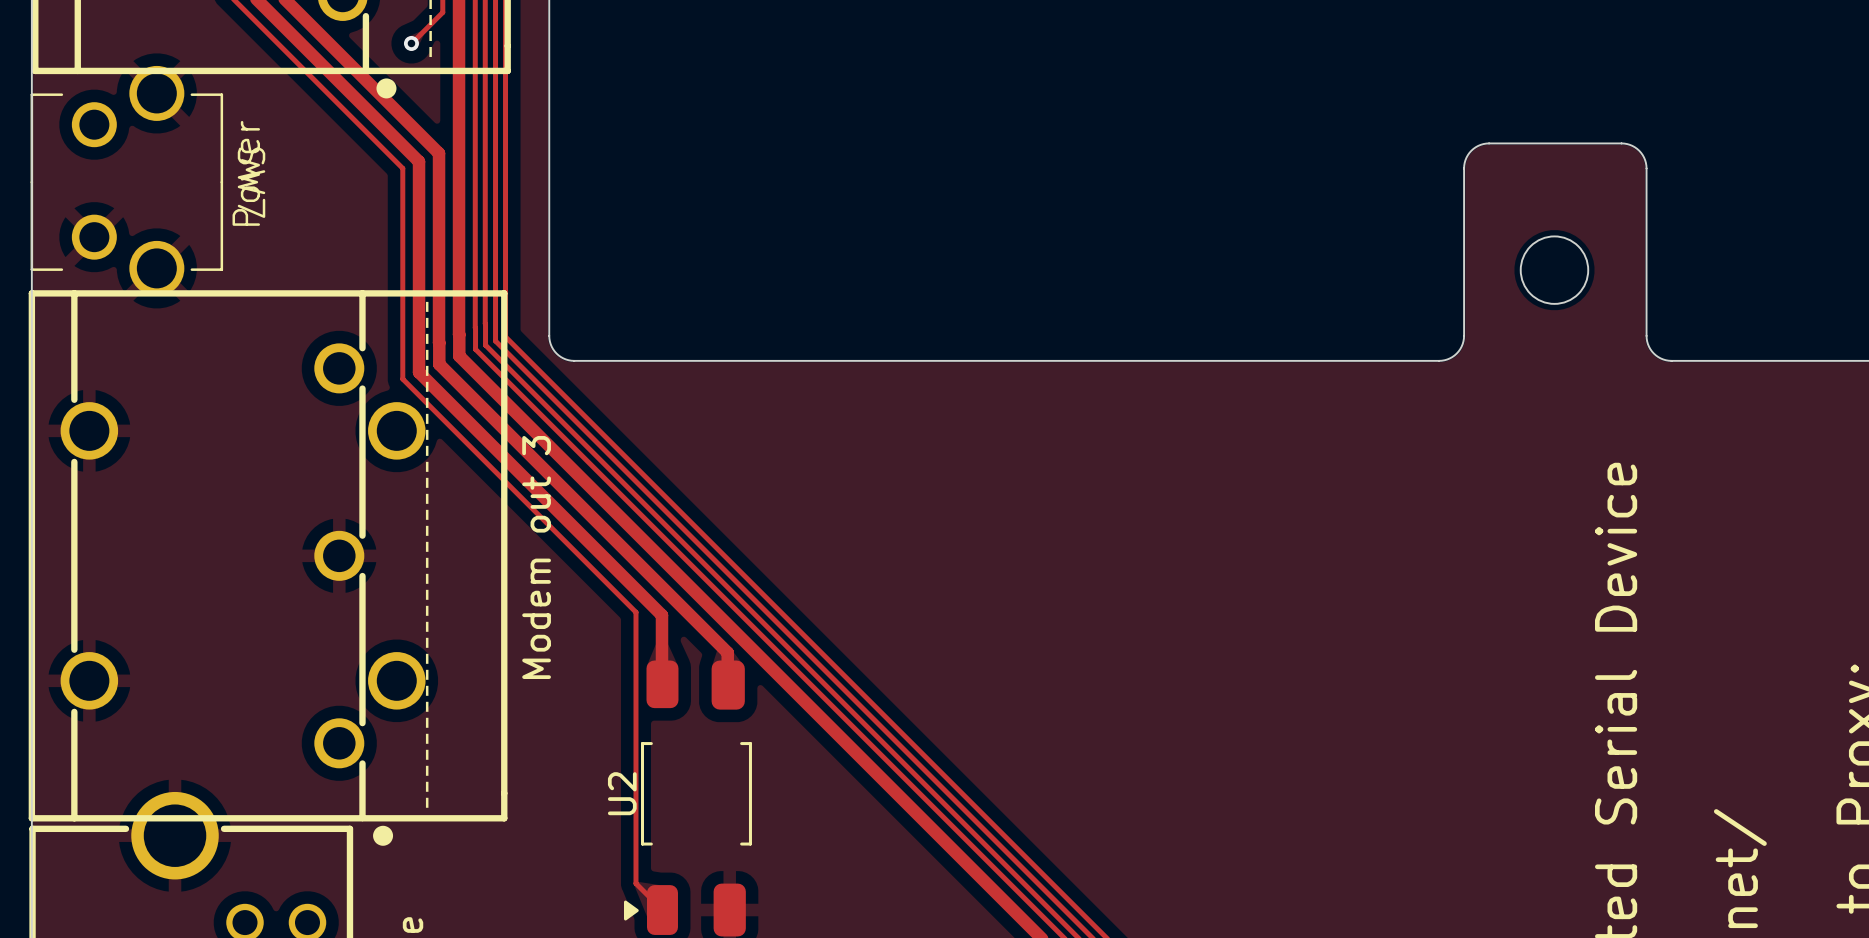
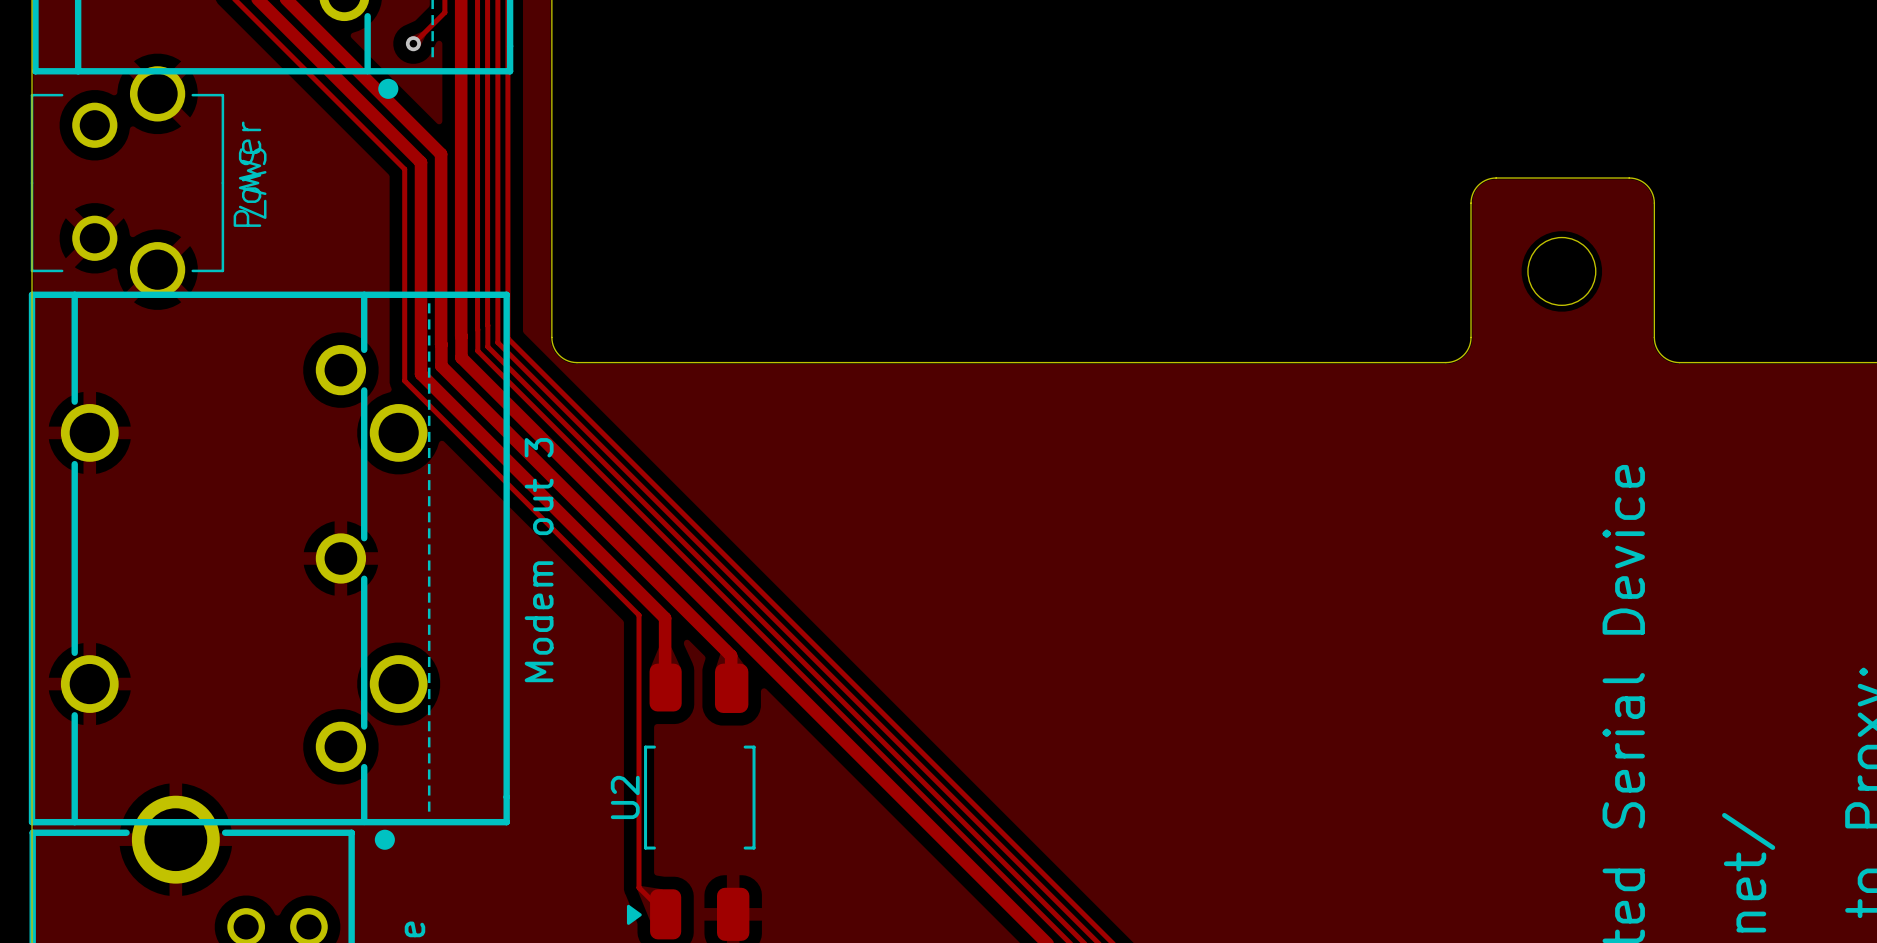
board edge: (1464, 202) (1464, 168) (1466, 157) (1475, 147) (1489, 143) (1629, 144) (1639, 150) (1645, 160) (1646, 202) -> (1471, 203) (1472, 194) (1478, 185) (1485, 180) (1496, 178) (1632, 178) (1646, 185) (1651, 192) (1654, 203)

